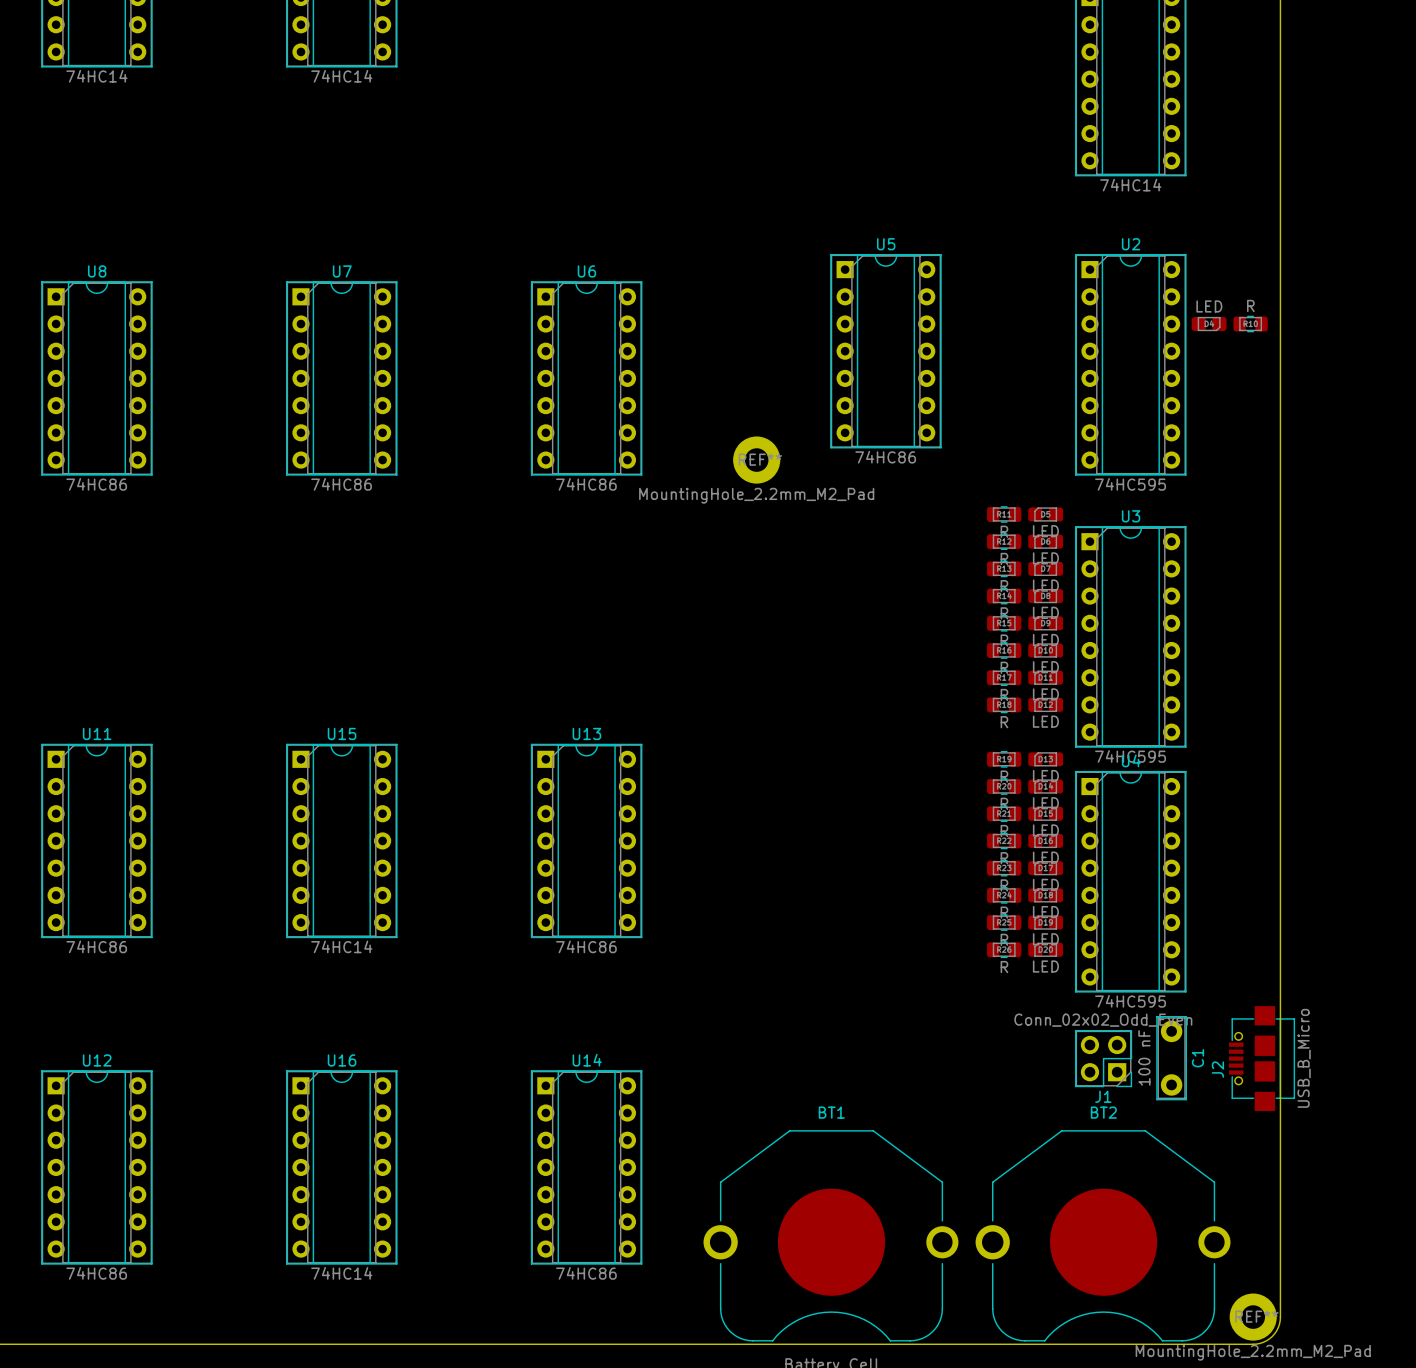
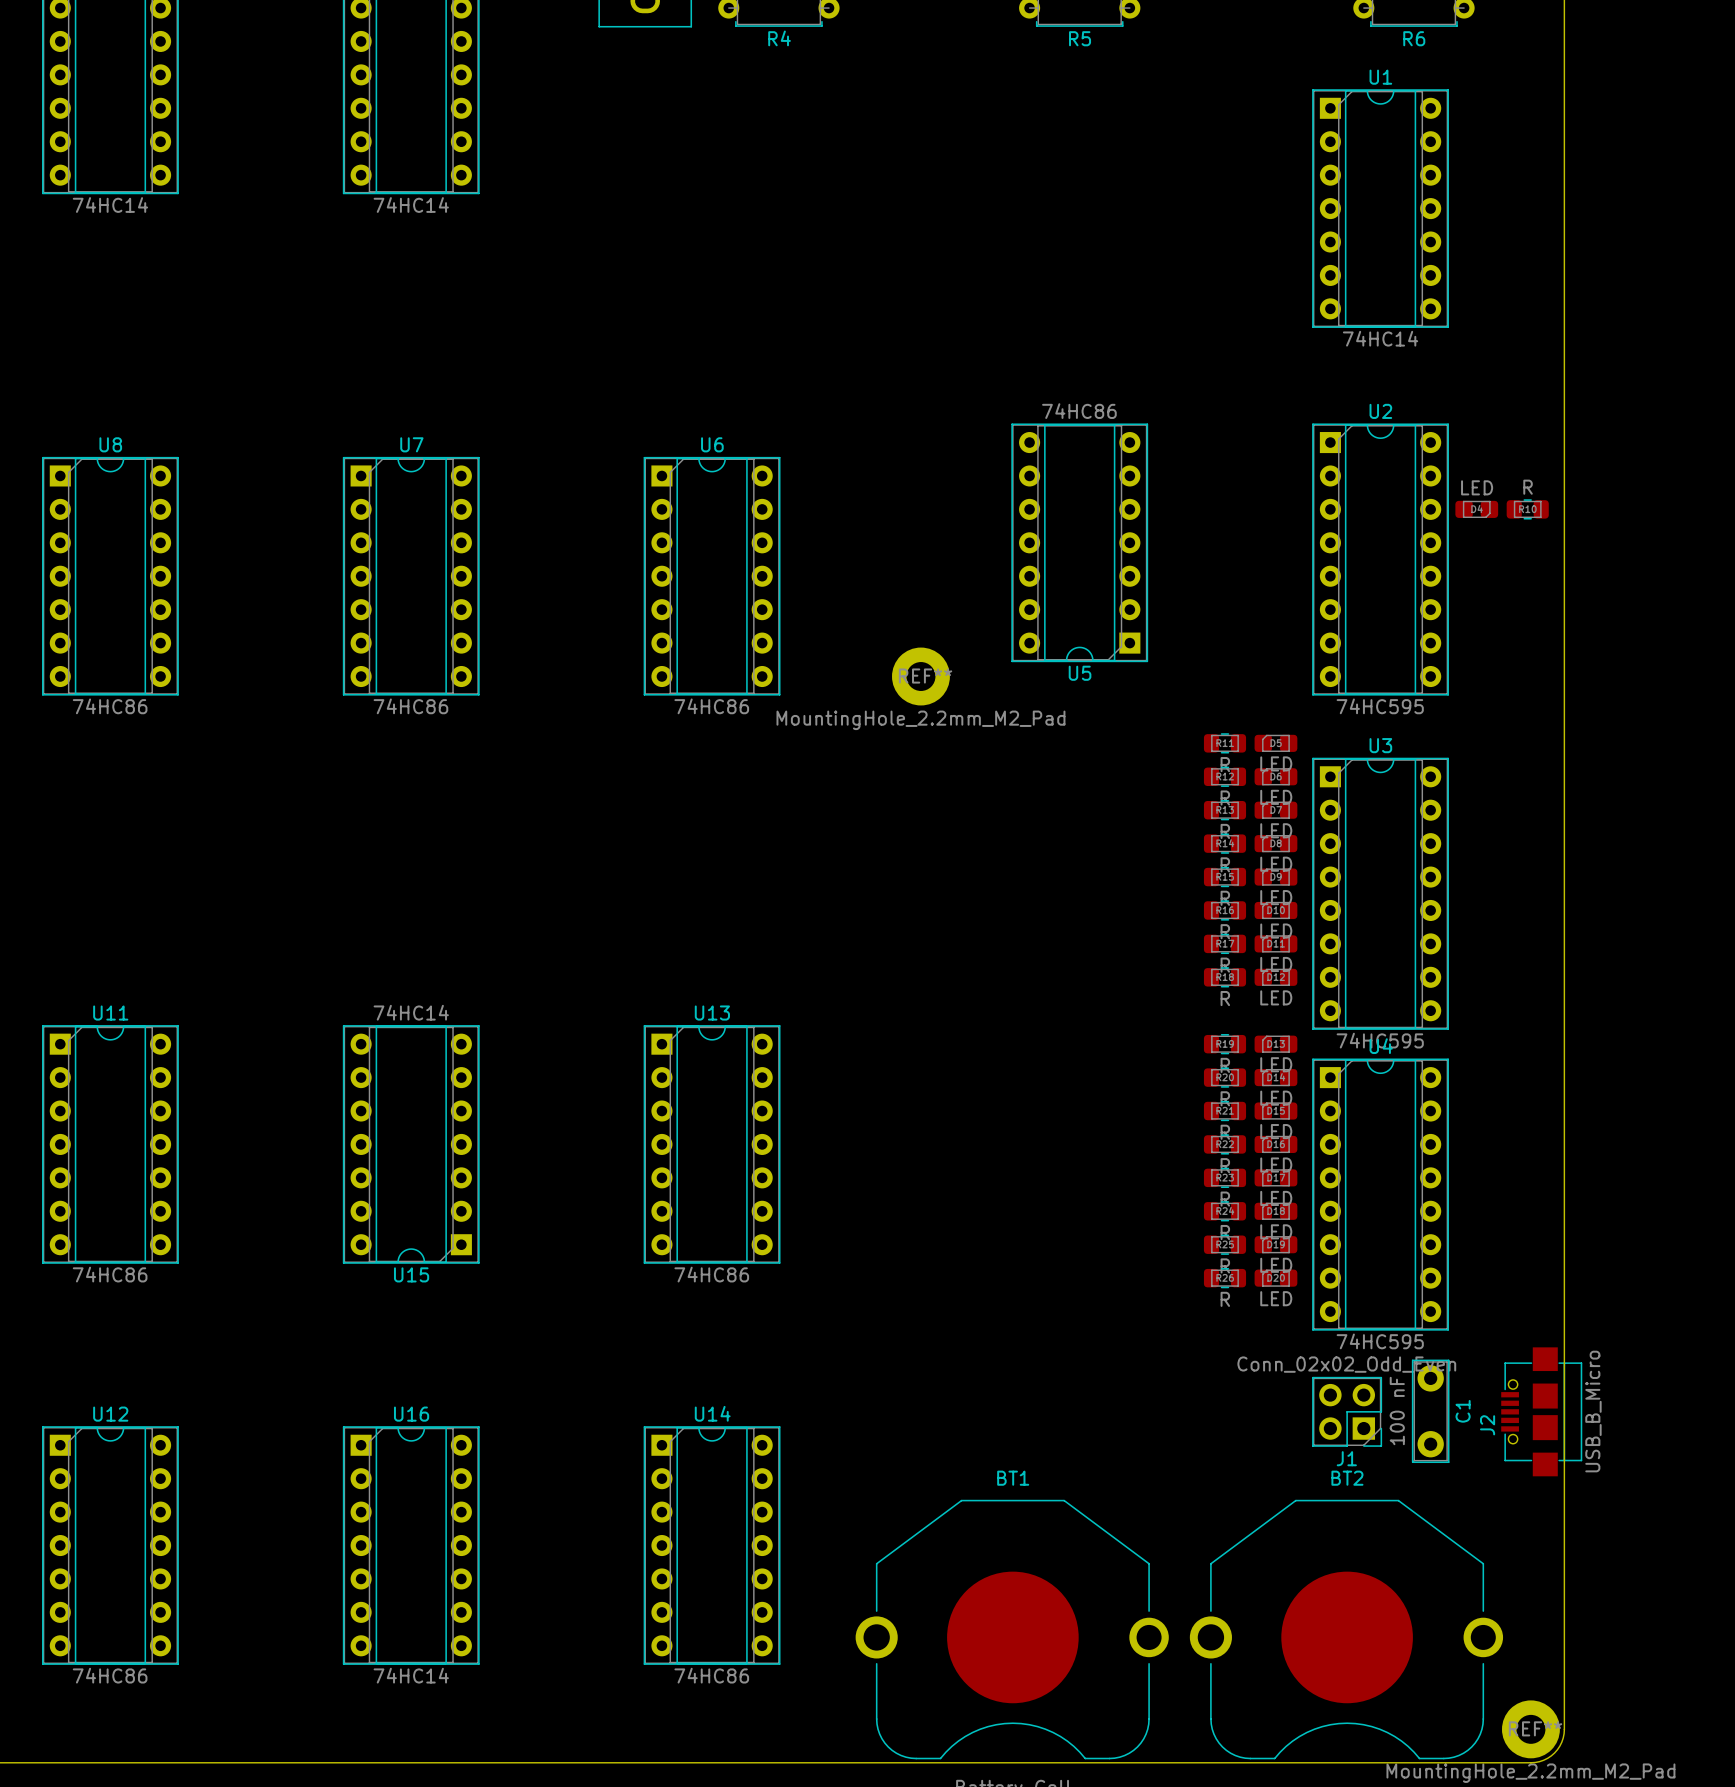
U5 rotation: 0° (885, 351) -> 180° (1079, 542)
U15 rotation: 0° (341, 840) -> 180° (411, 1144)

